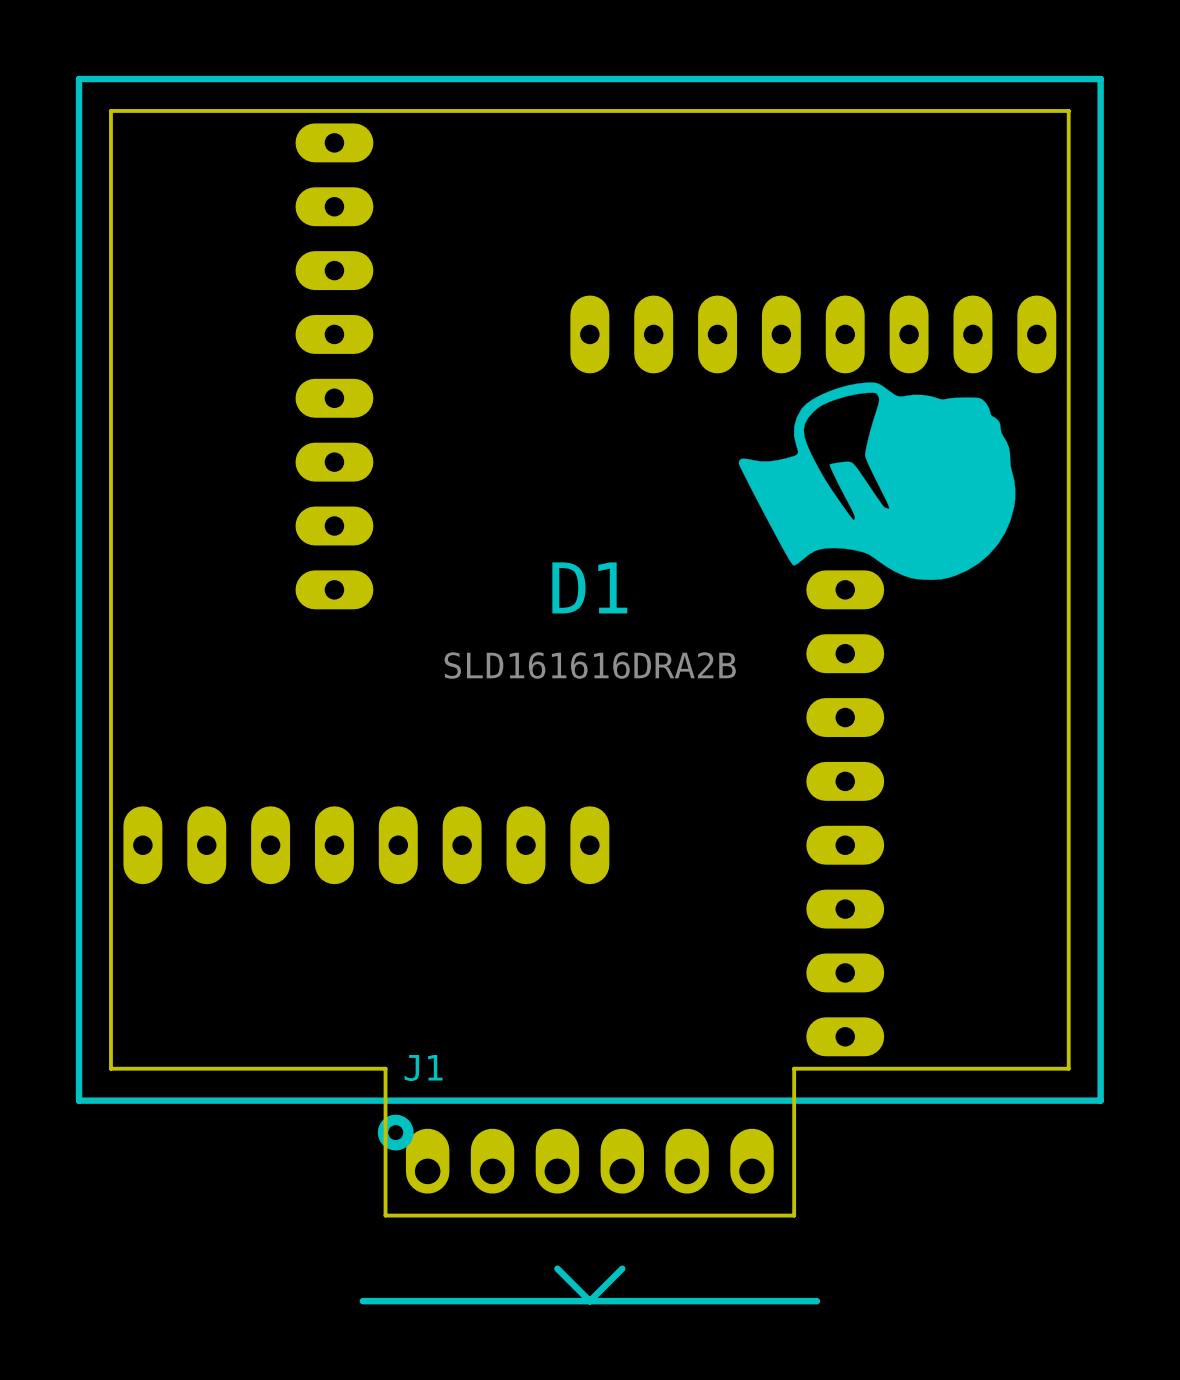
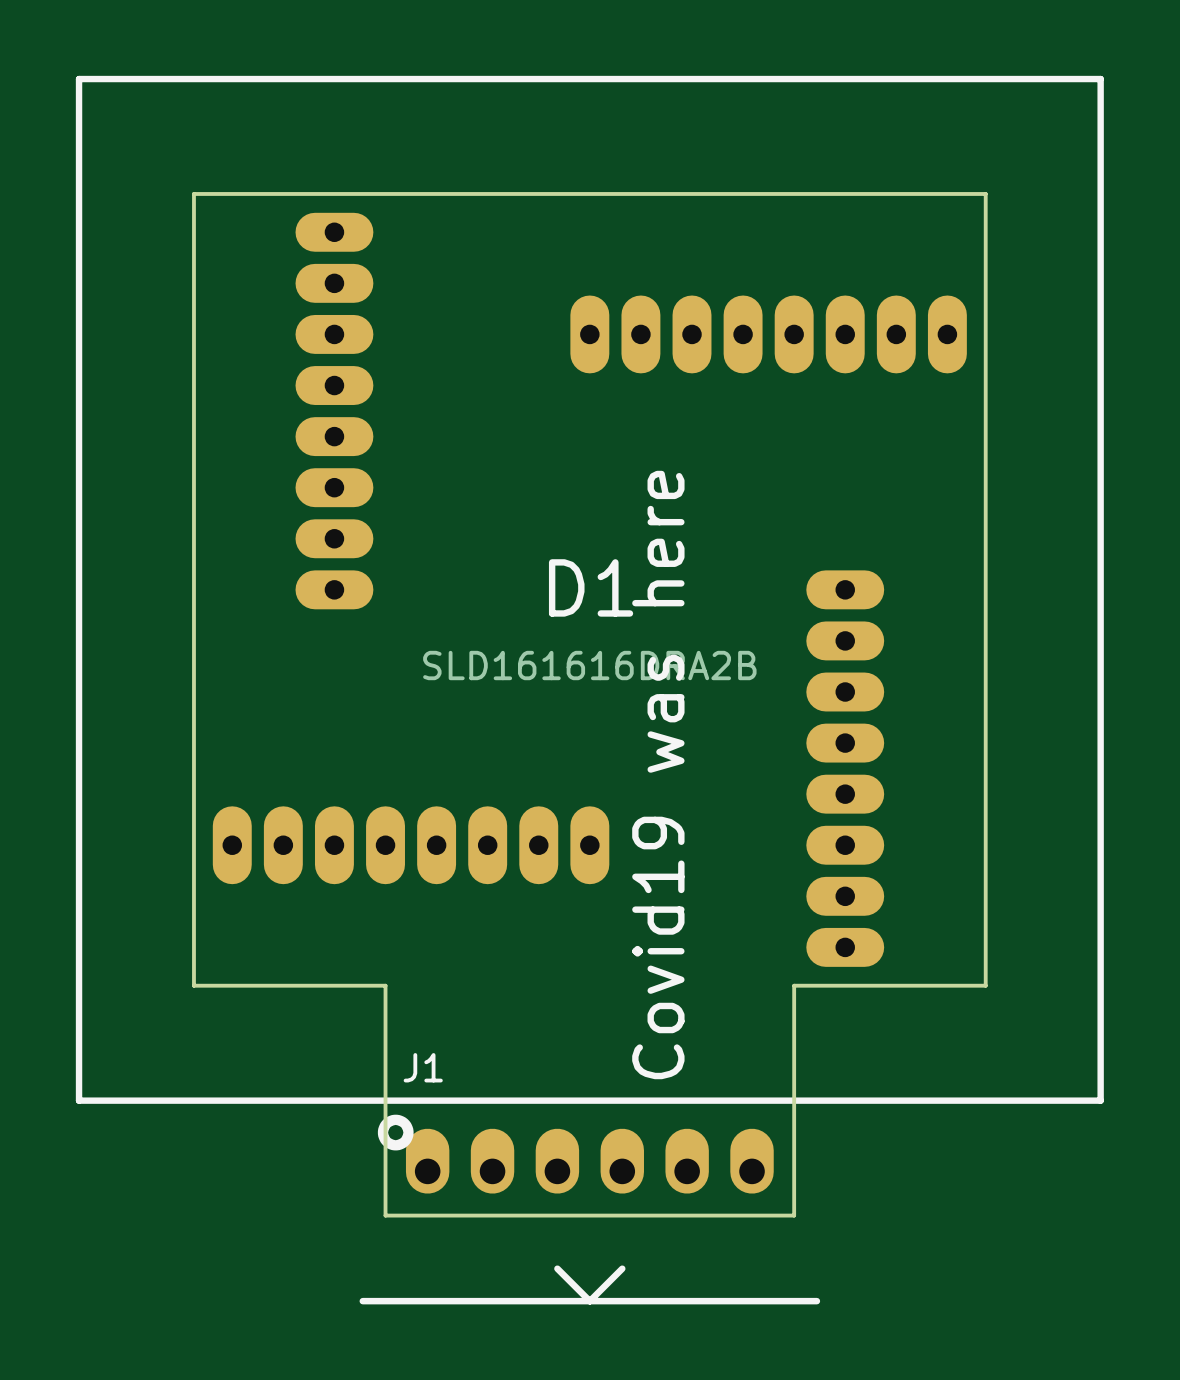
D1 footprint: [75, 75, 1104, 1104] -> [75, 75, 1104, 1104]
drawing: [738, 382, 1016, 580] -> none
text: none -> Covid19 was here (658, 775)
board edge: (385, 1068) (110, 1068) (110, 110) (1068, 110) (1068, 1068) (794, 1068) -> (385, 1068) (385, 985) (193, 985) (193, 193) (985, 193) (985, 985) (794, 985) (794, 1068)

